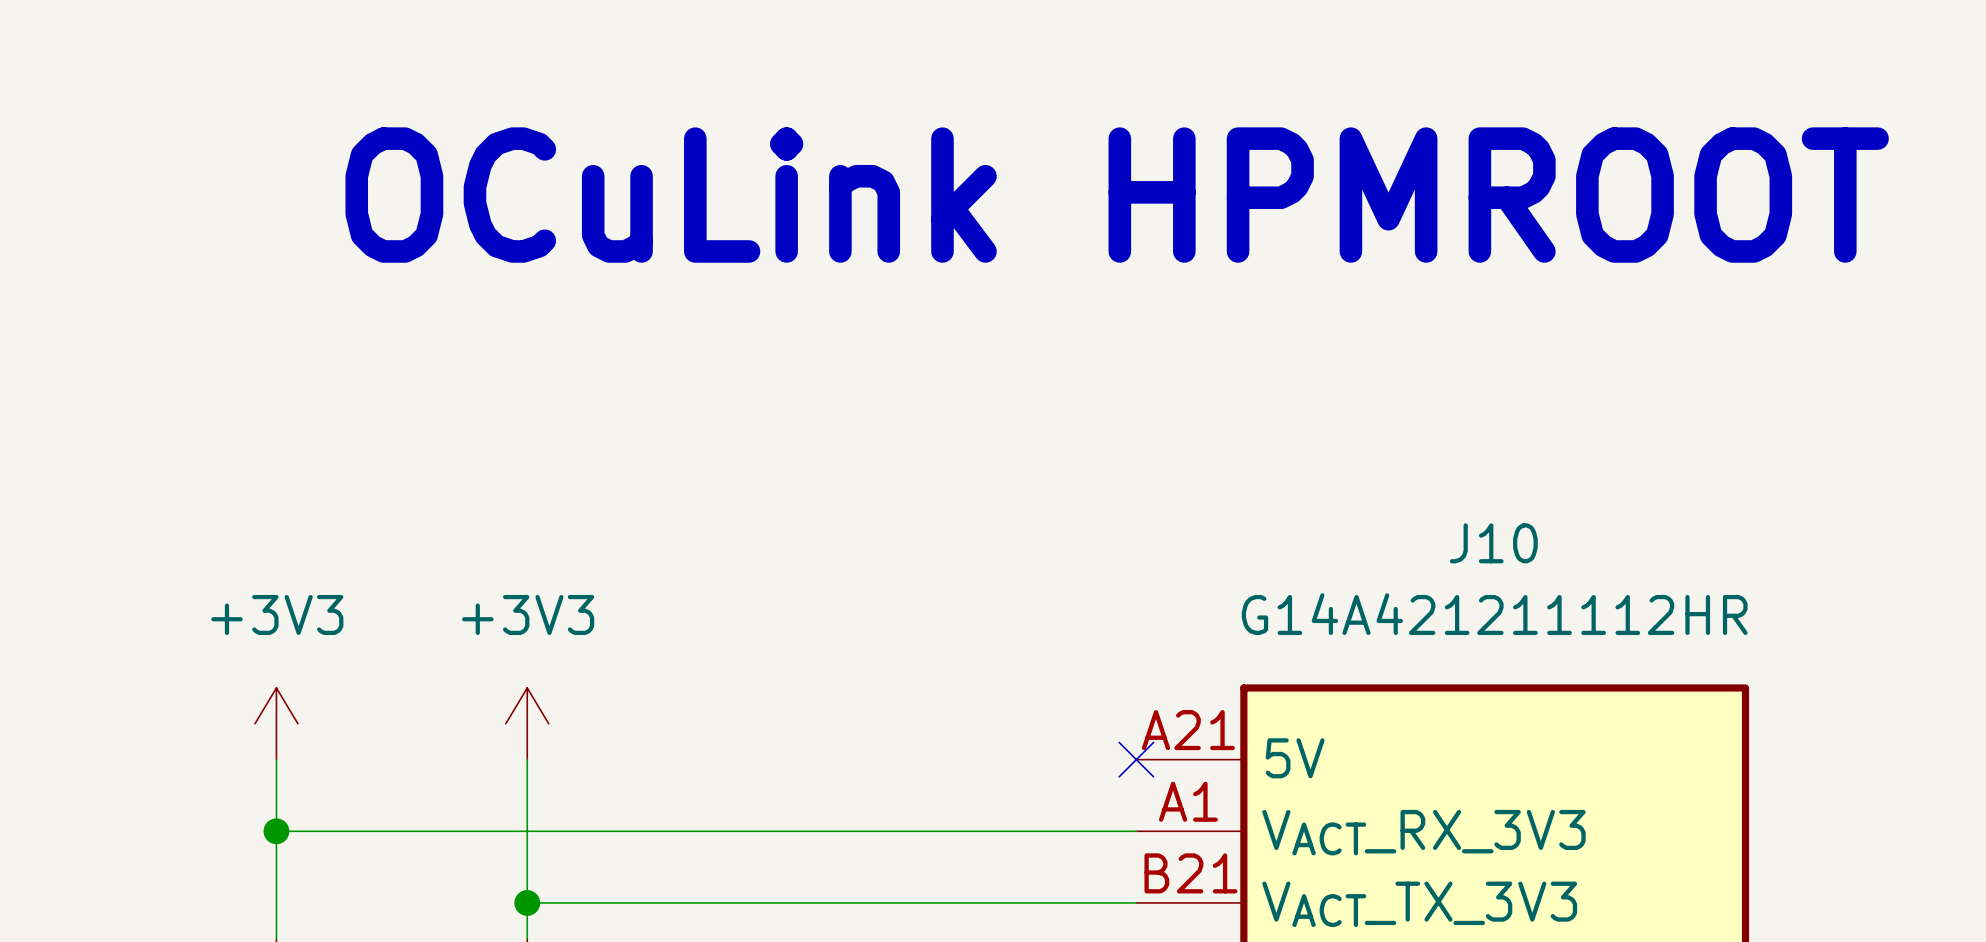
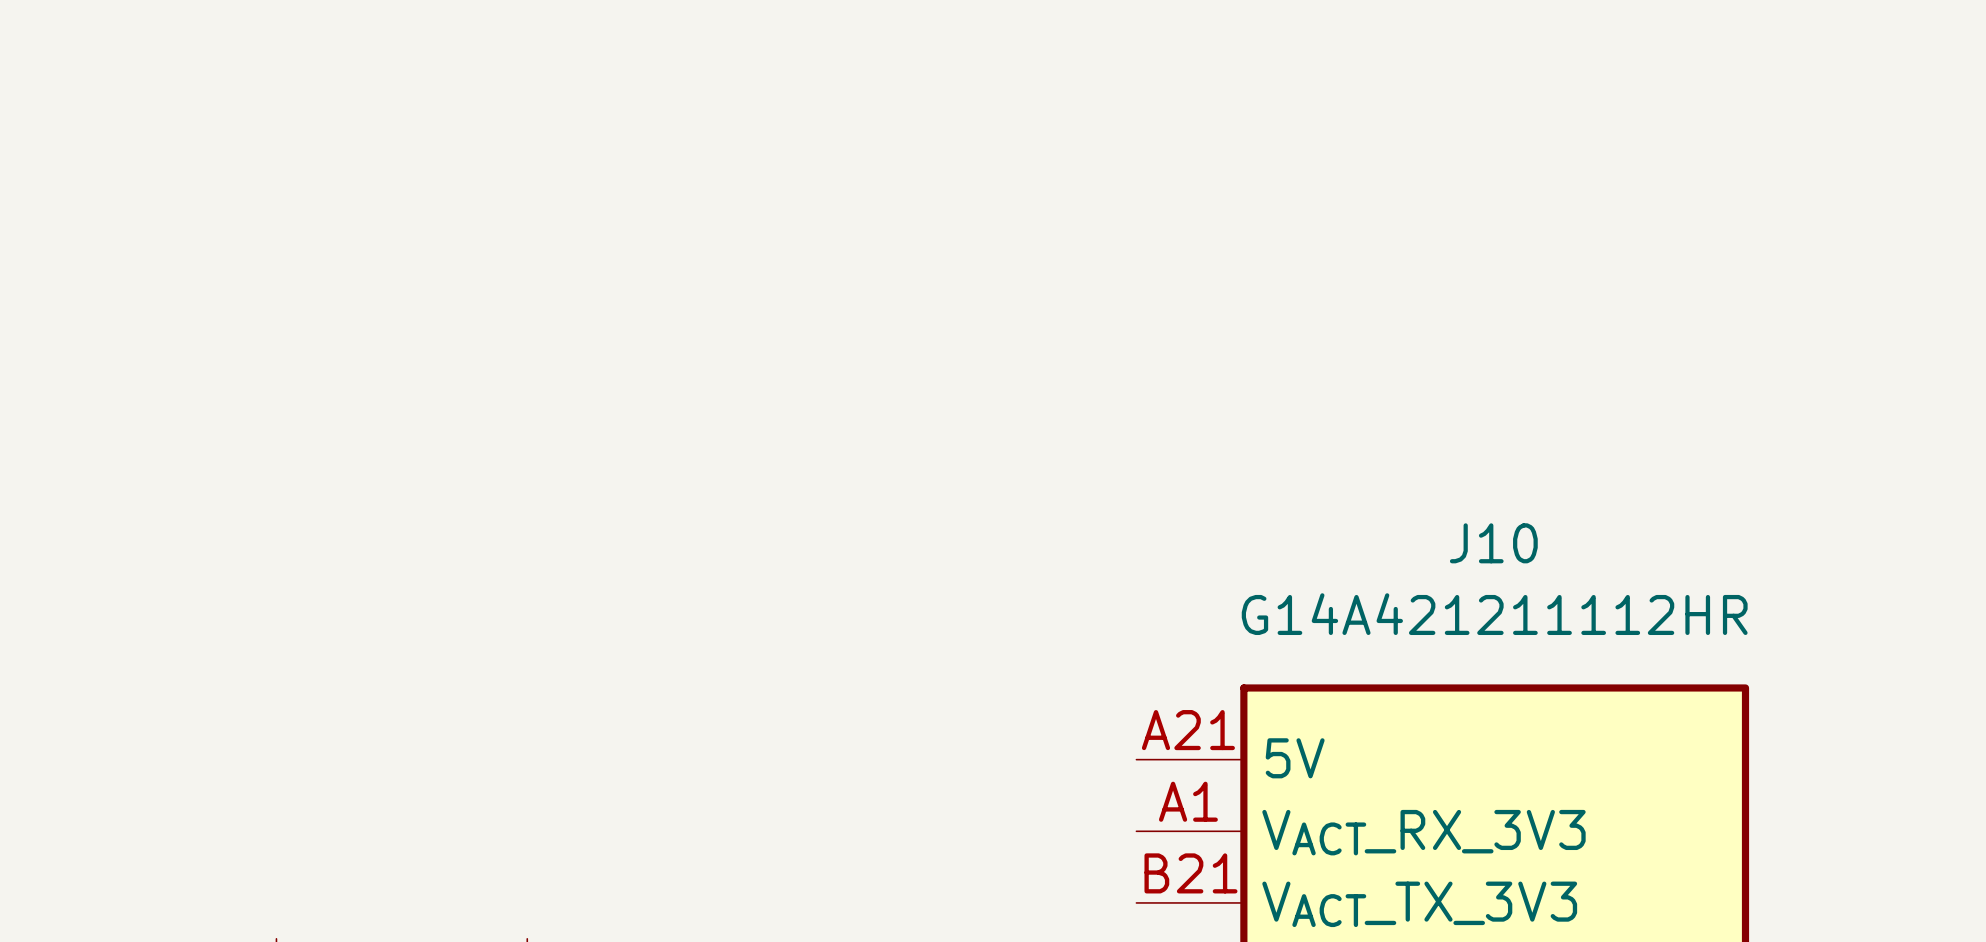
text: OCuLink HPMROOT (1117, 195) -> none
power symbol: +3V3 (276, 723) -> none
power symbol: +3V3 (527, 723) -> none
wire: (276, 759) (276, 938) -> none
wire: (527, 759) (527, 938) -> none
no-connect mark: (1136, 759) -> none
wire: (276, 831) (1136, 831) -> none
junction: (276, 831) -> none
wire: (527, 902) (1136, 902) -> none
junction: (527, 902) -> none

